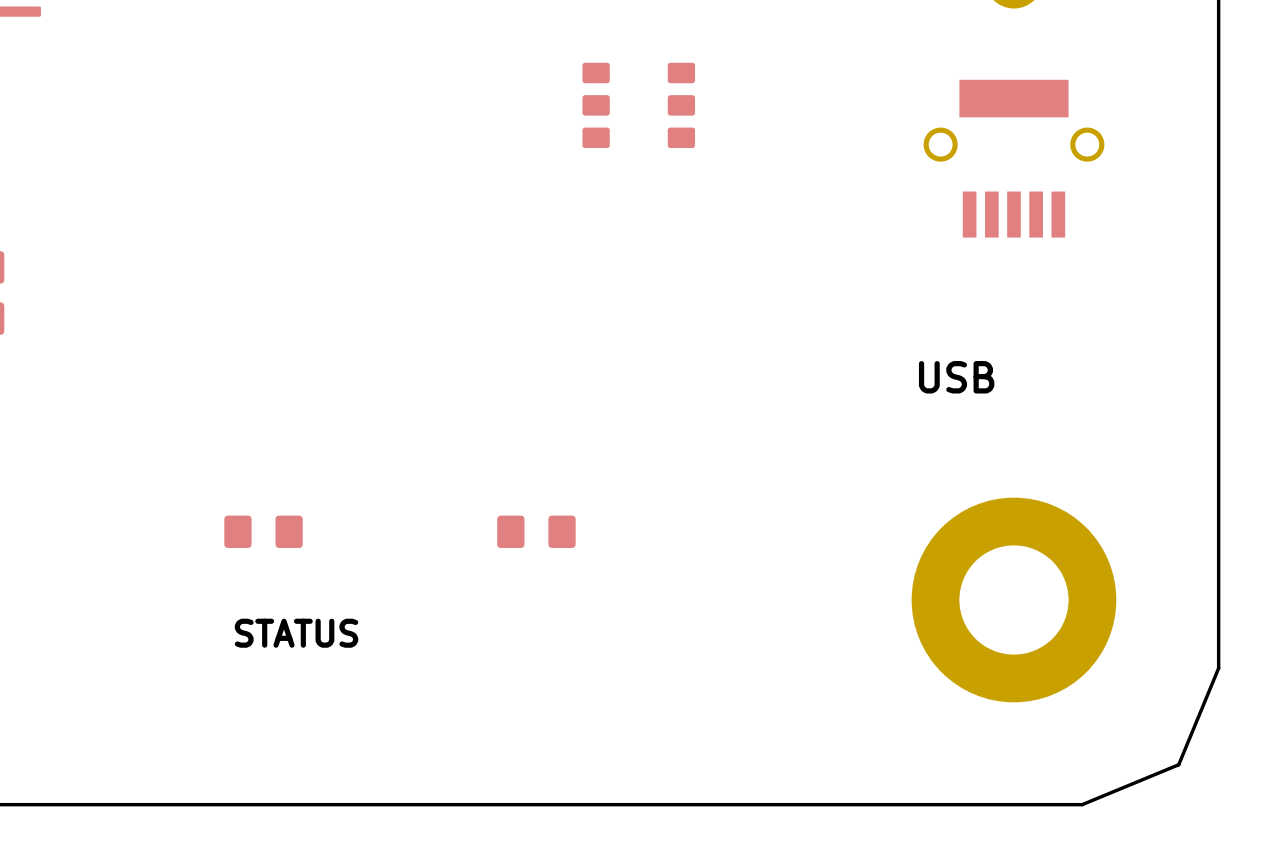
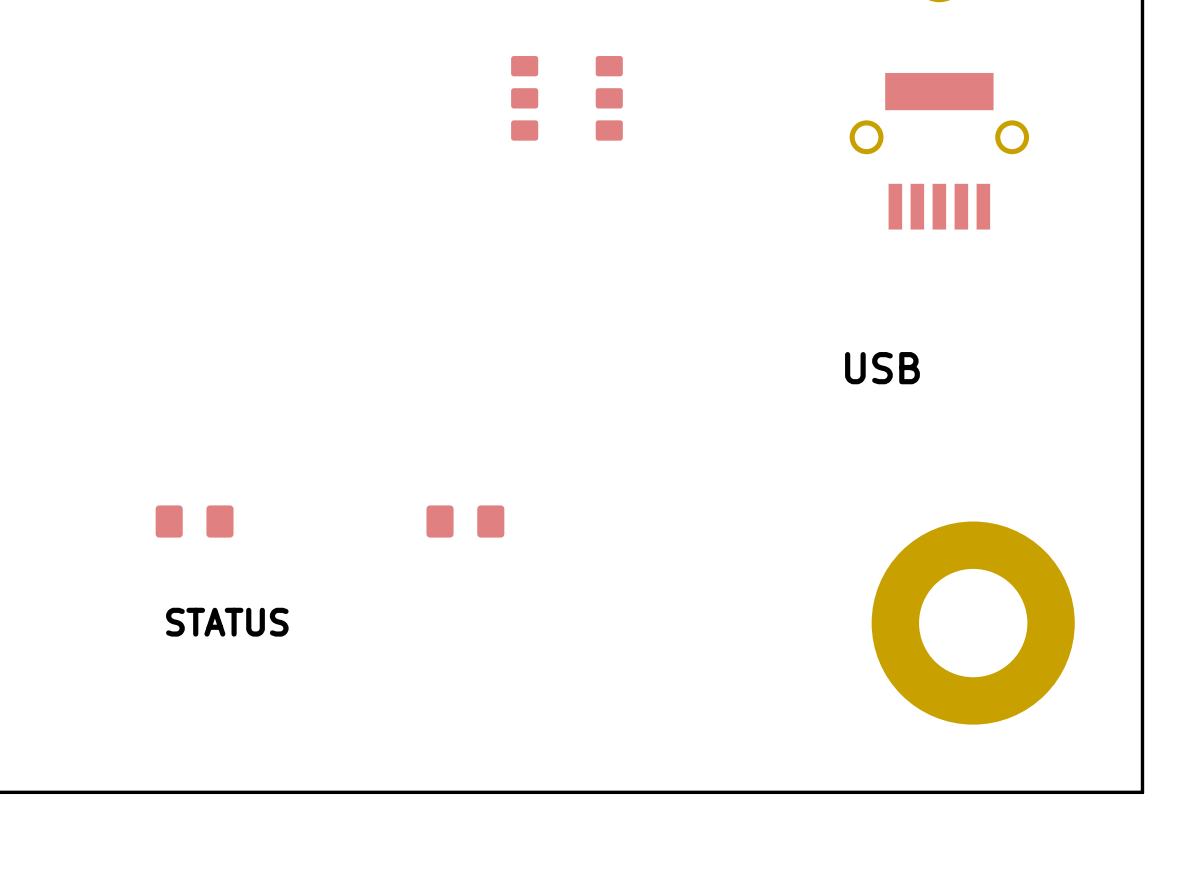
part position: (1013, 600) -> (973, 623)
board edge: (1218, 668) (1178, 764) (1082, 804) -> (1142, 656) (1142, 792) (1007, 792)

